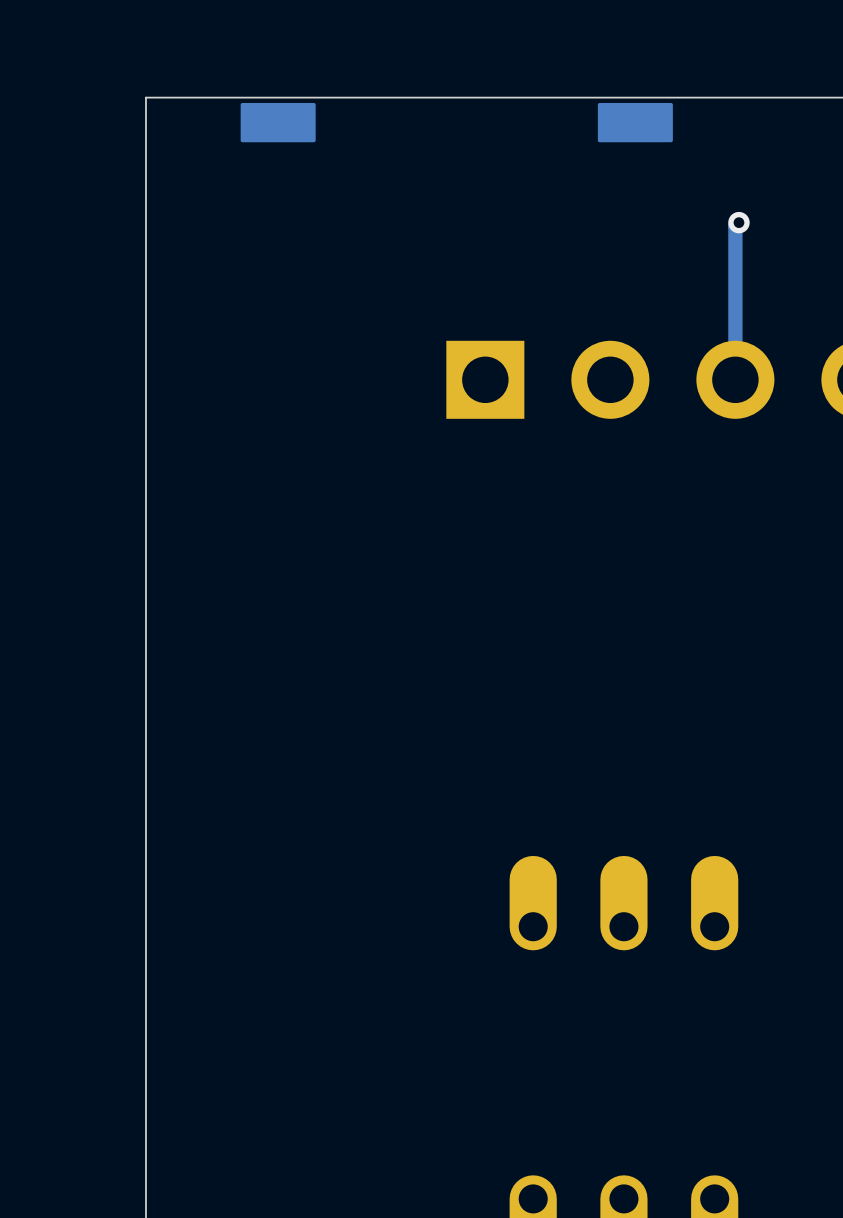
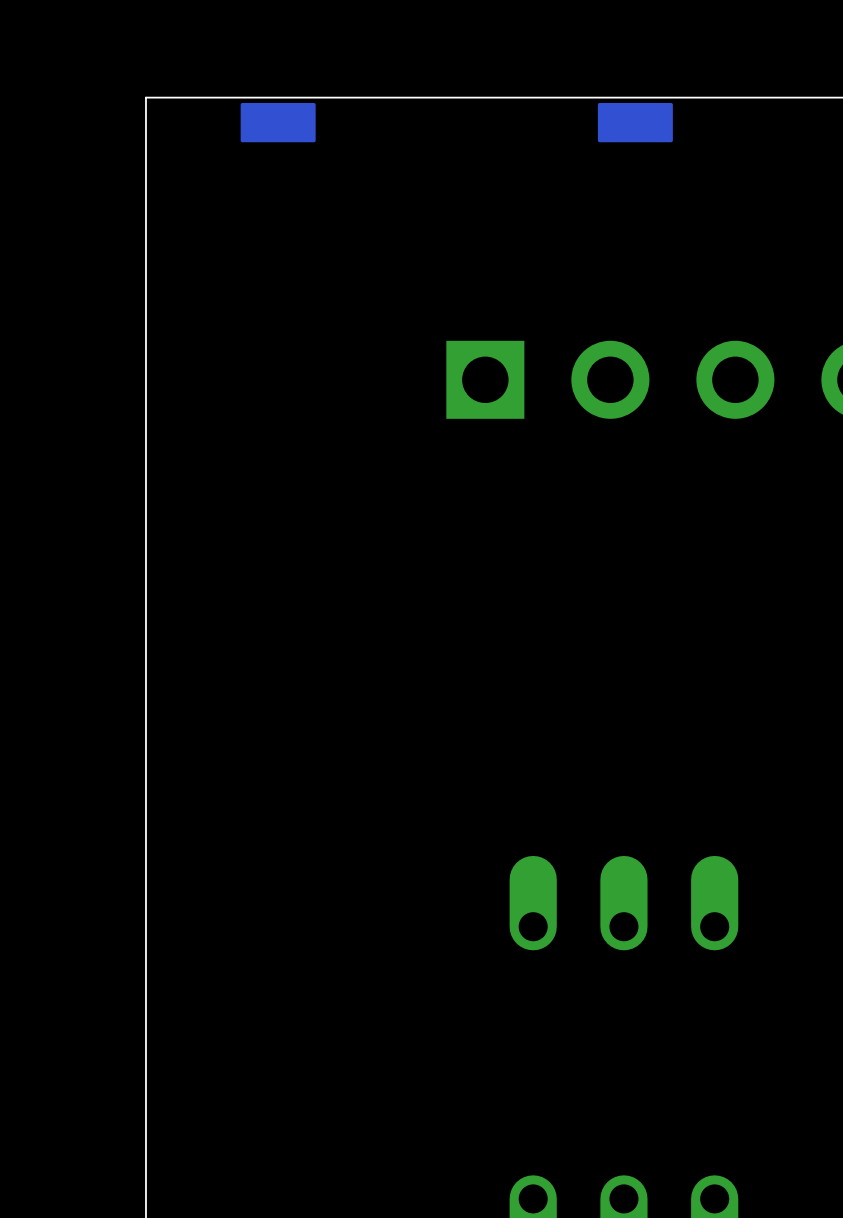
track: (738, 222) (735, 226) (735, 379) -> none
via: (738, 222) -> none

